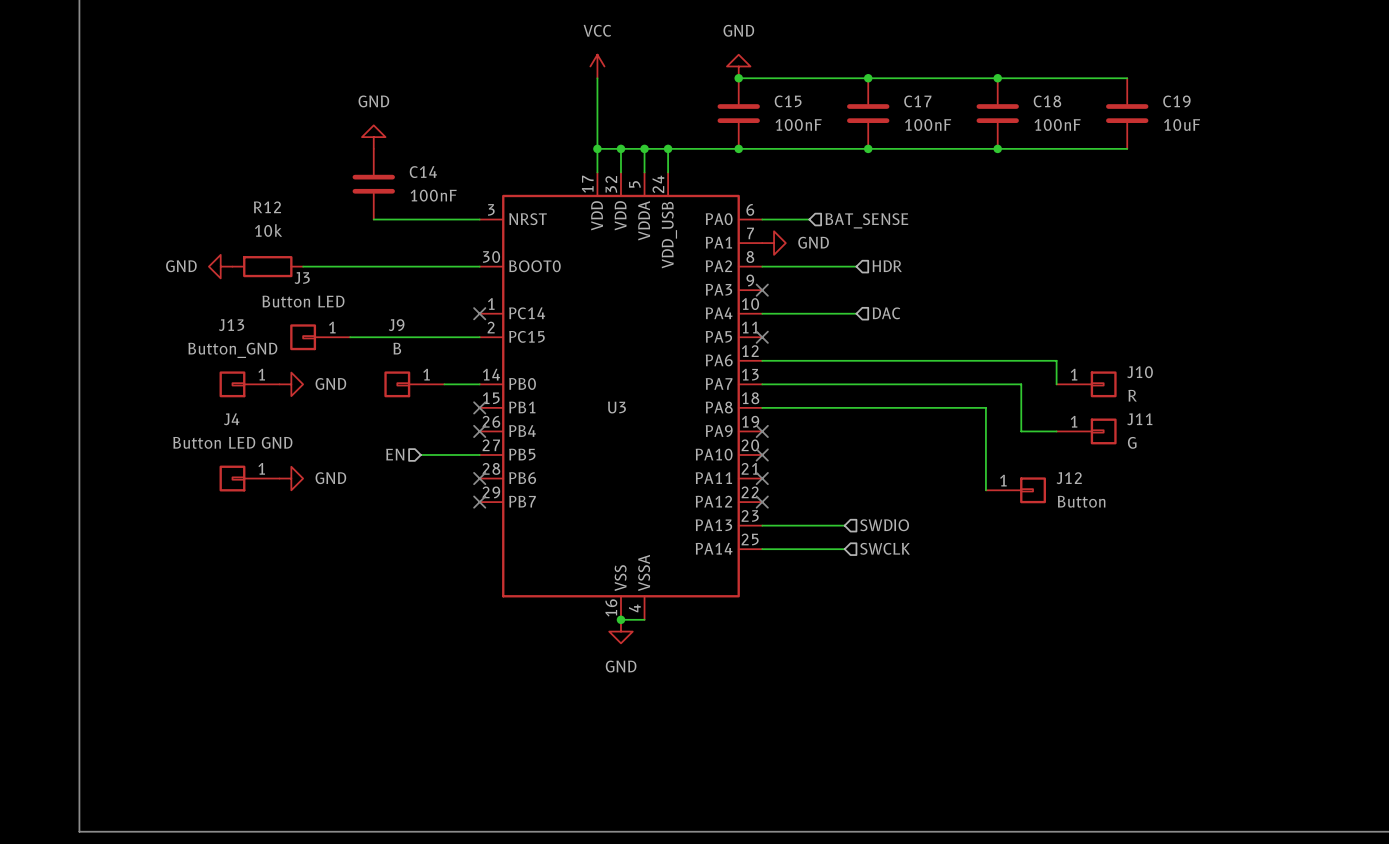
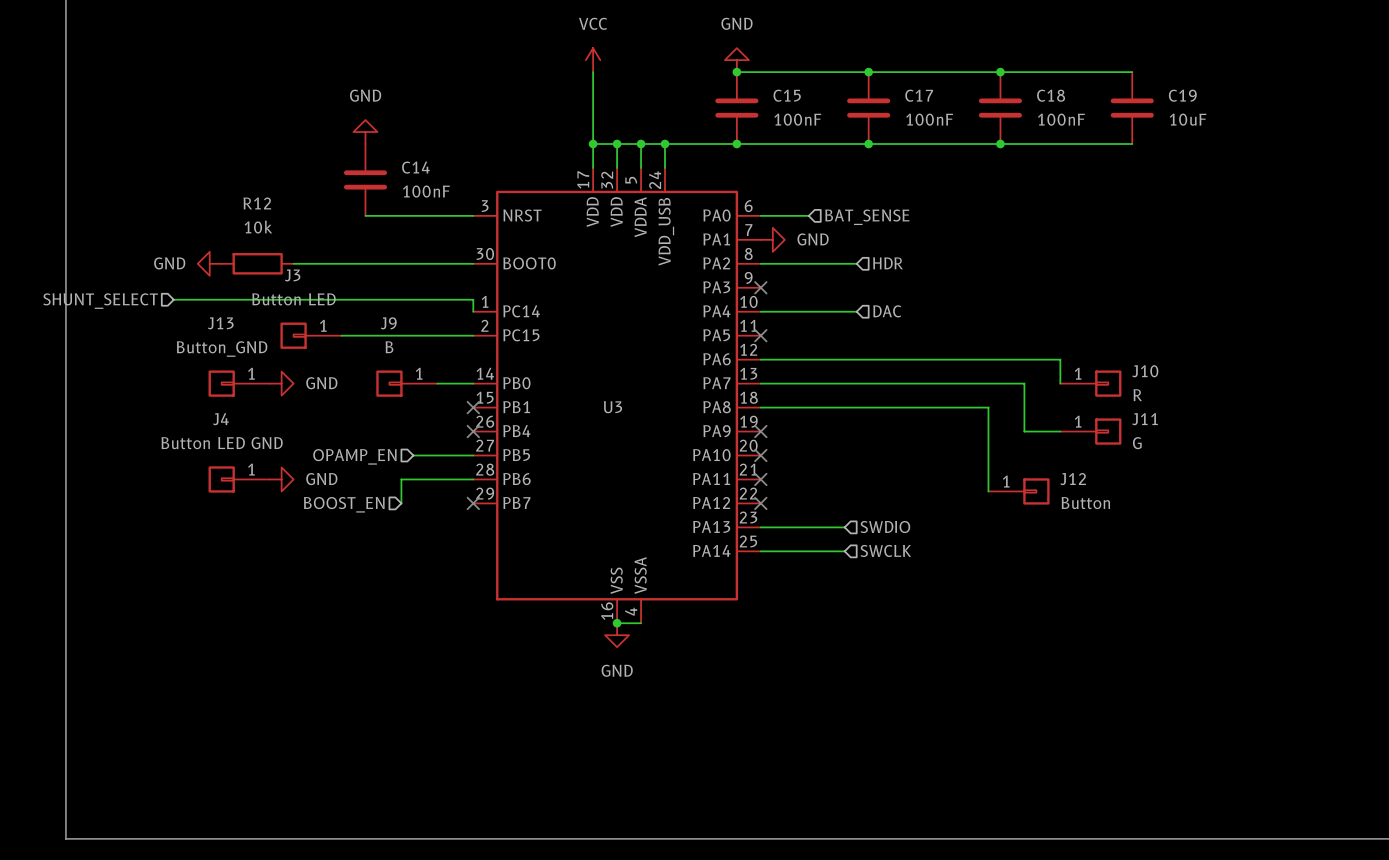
wire: none -> (173, 299) (473, 299) (473, 311)
hierarchical label: none -> SHUNT_SELECT (100, 301)
no-connect mark: (479, 313) -> none
hierarchical label: EN (395, 454) -> OPAMP_EN (354, 456)
wire: none -> (473, 479) (401, 479) (401, 503)
no-connect mark: (479, 478) -> none
hierarchical label: none -> BOOST_EN (344, 504)

